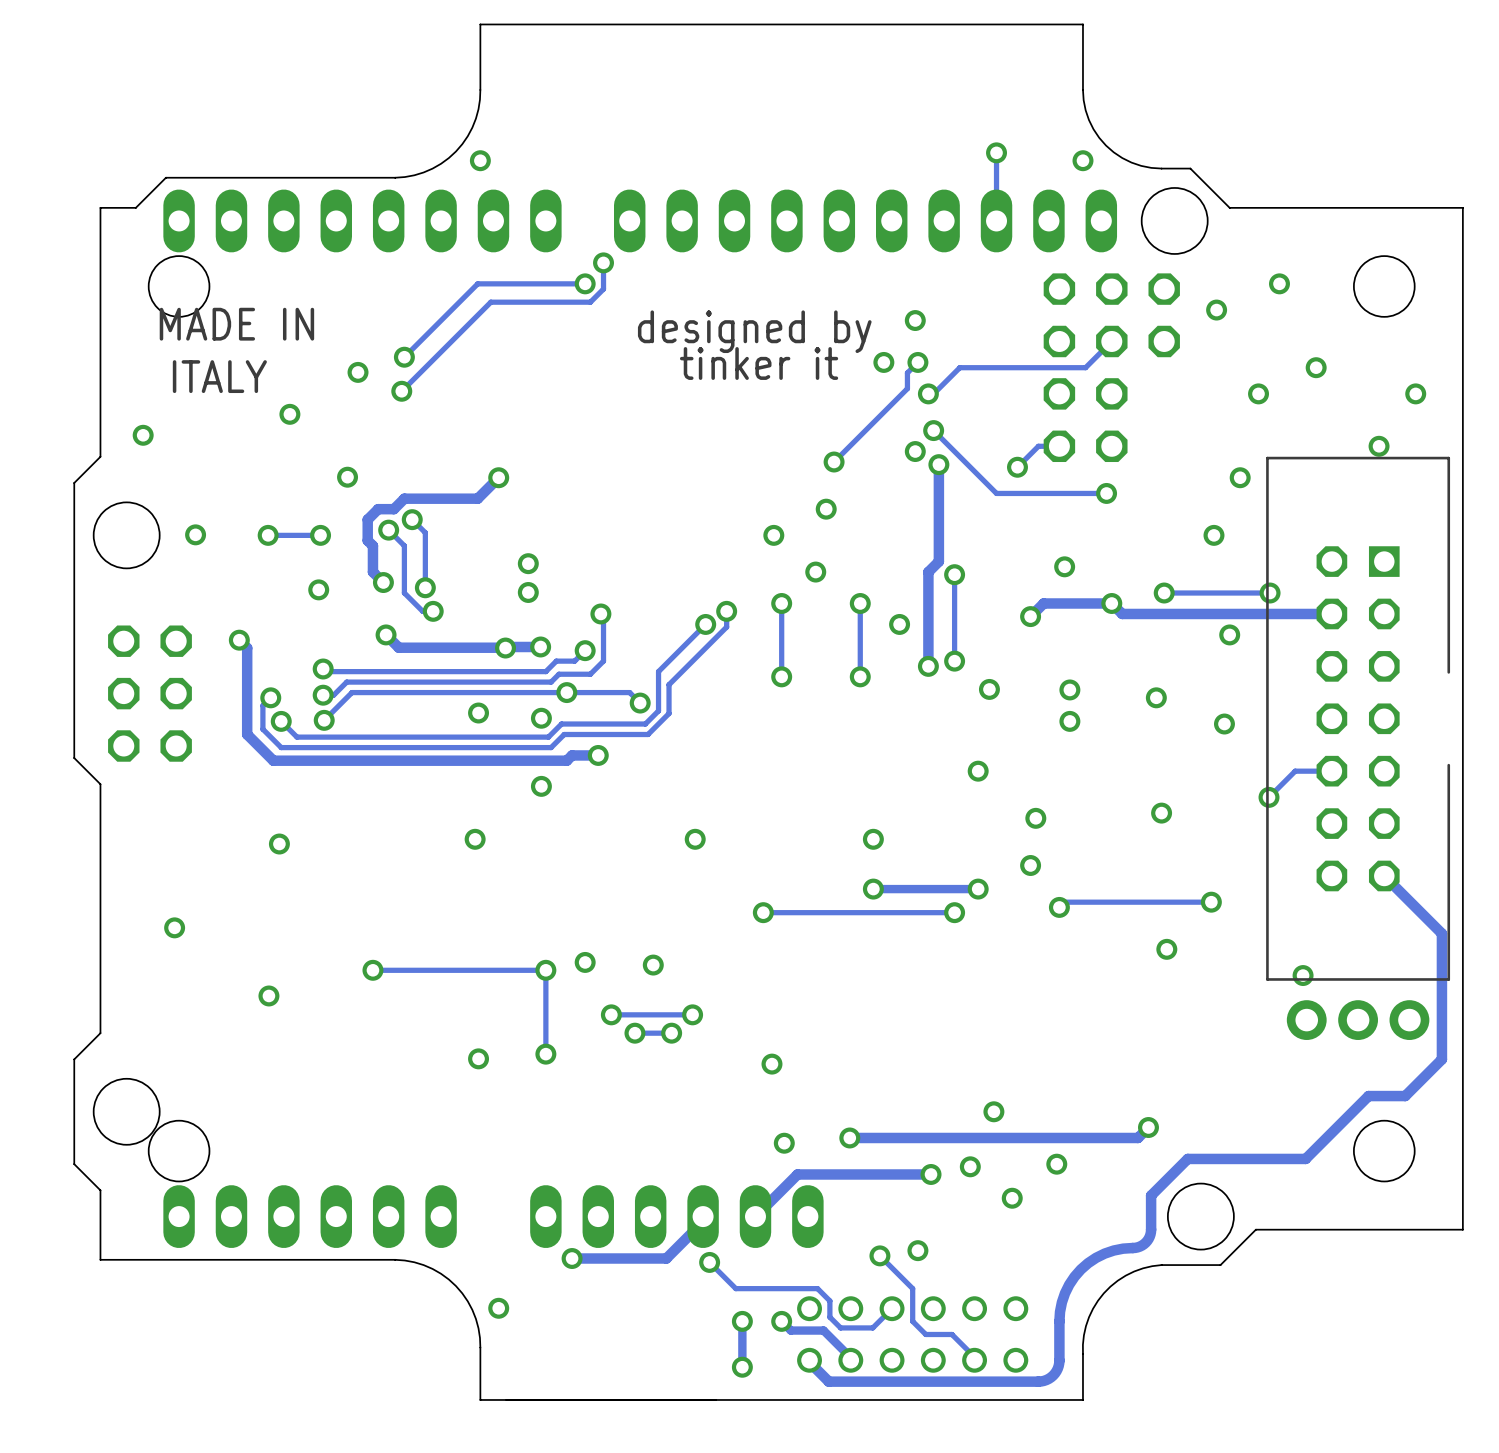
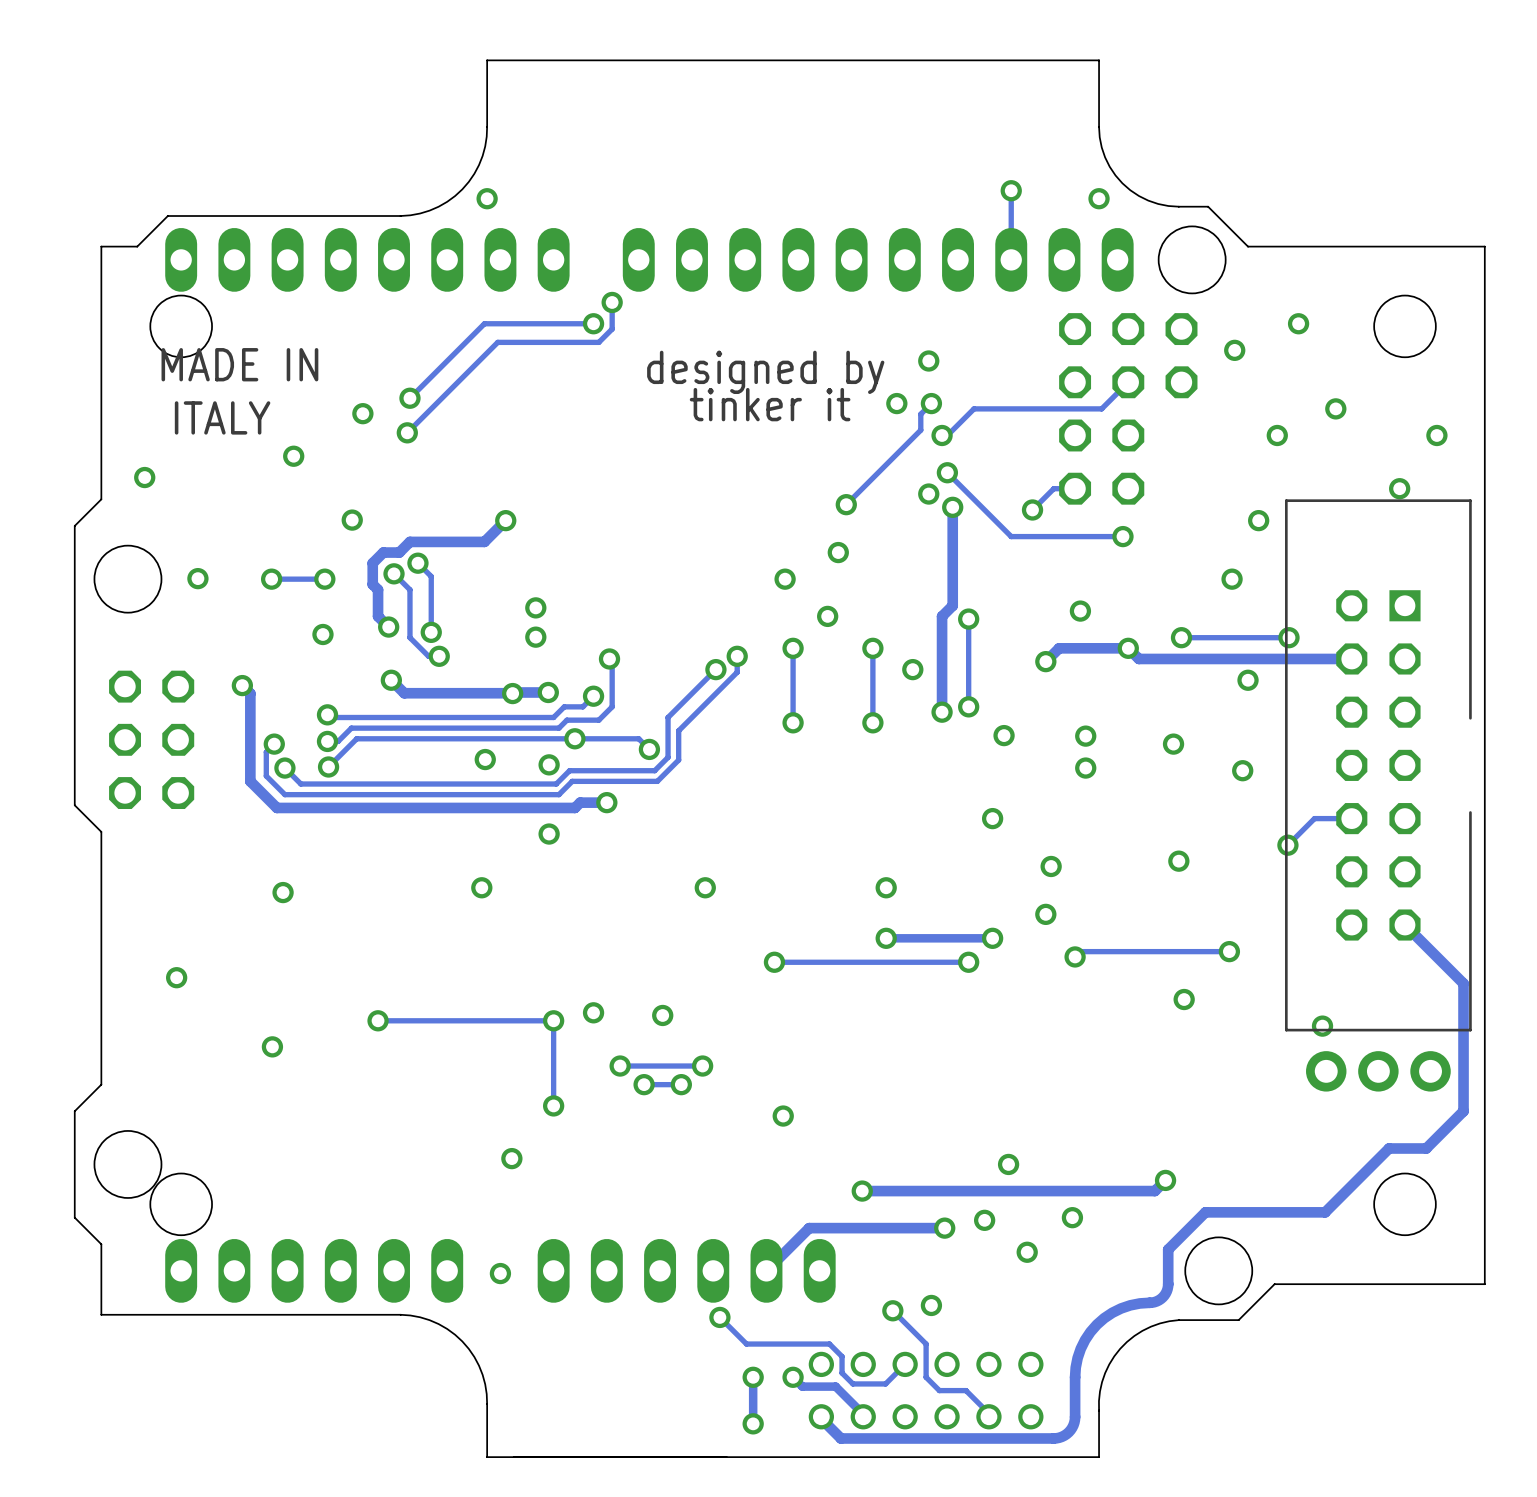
via position: (478, 1058) -> (511, 1158)
via: (784, 1143) -> none
track: (703, 1216) (703, 1221) (666, 1258) (572, 1258) -> none
via: none -> (500, 1273)
via: (572, 1258) -> none
via: (498, 1308) -> none

